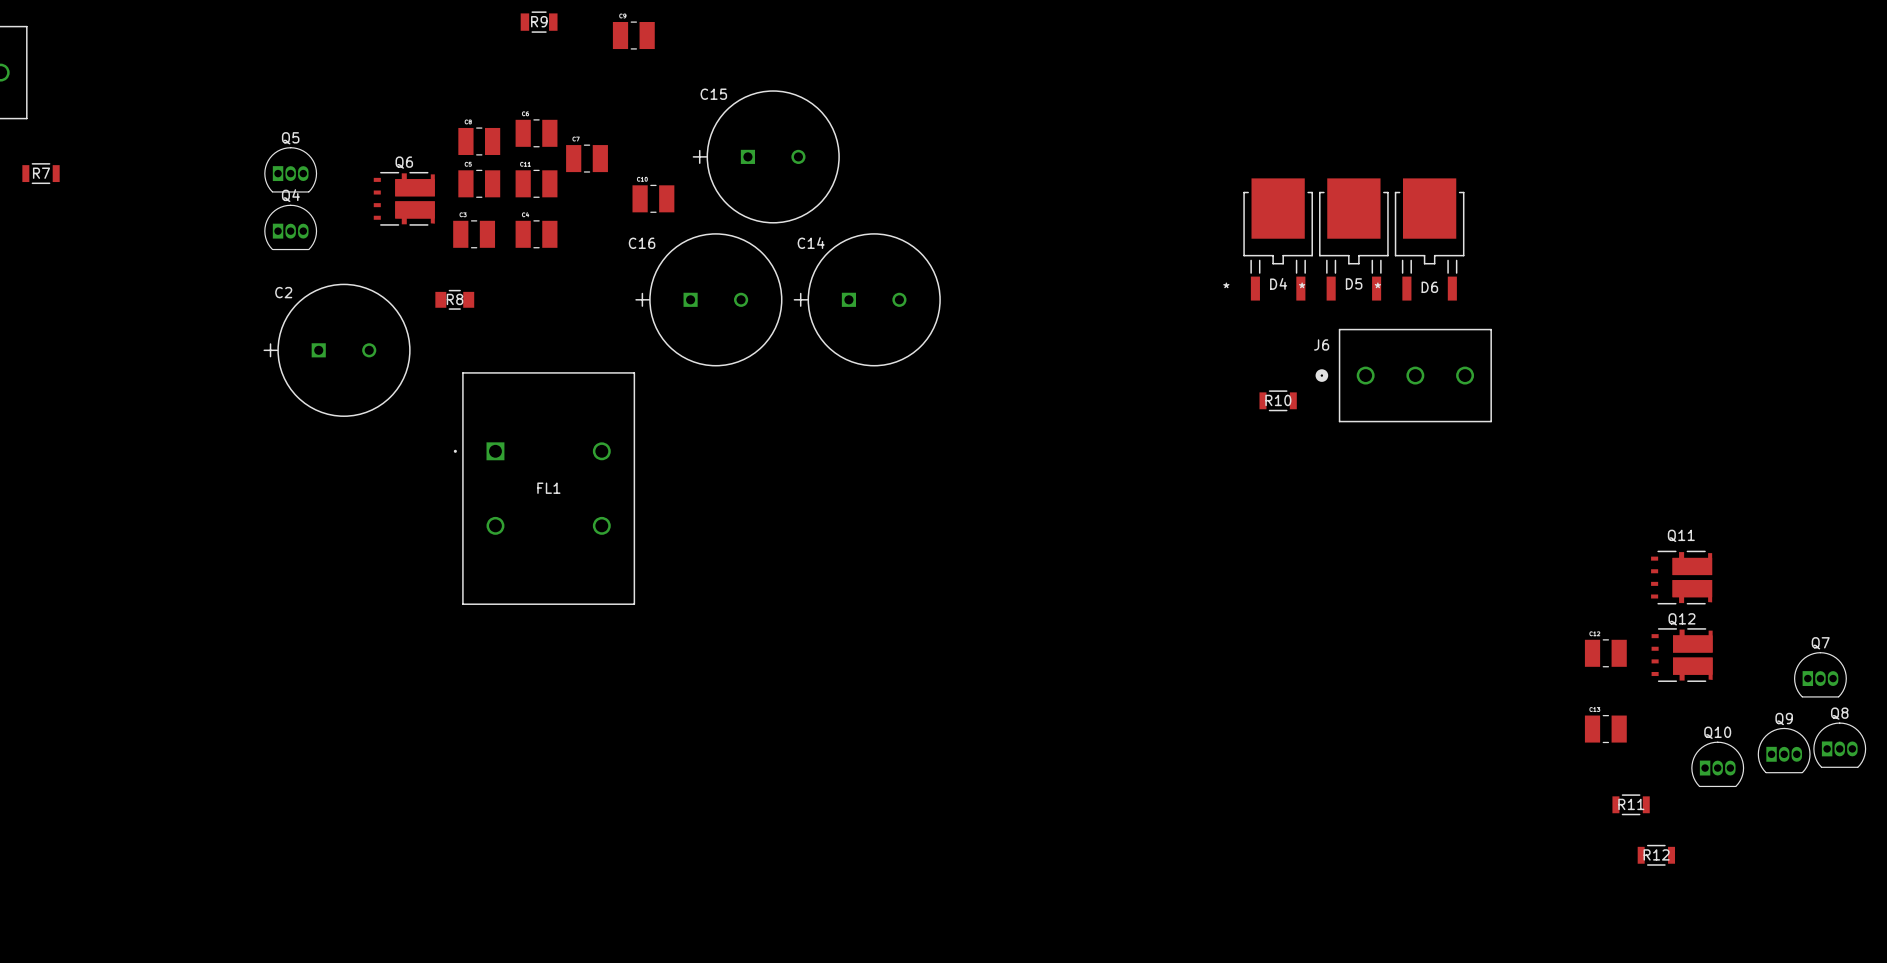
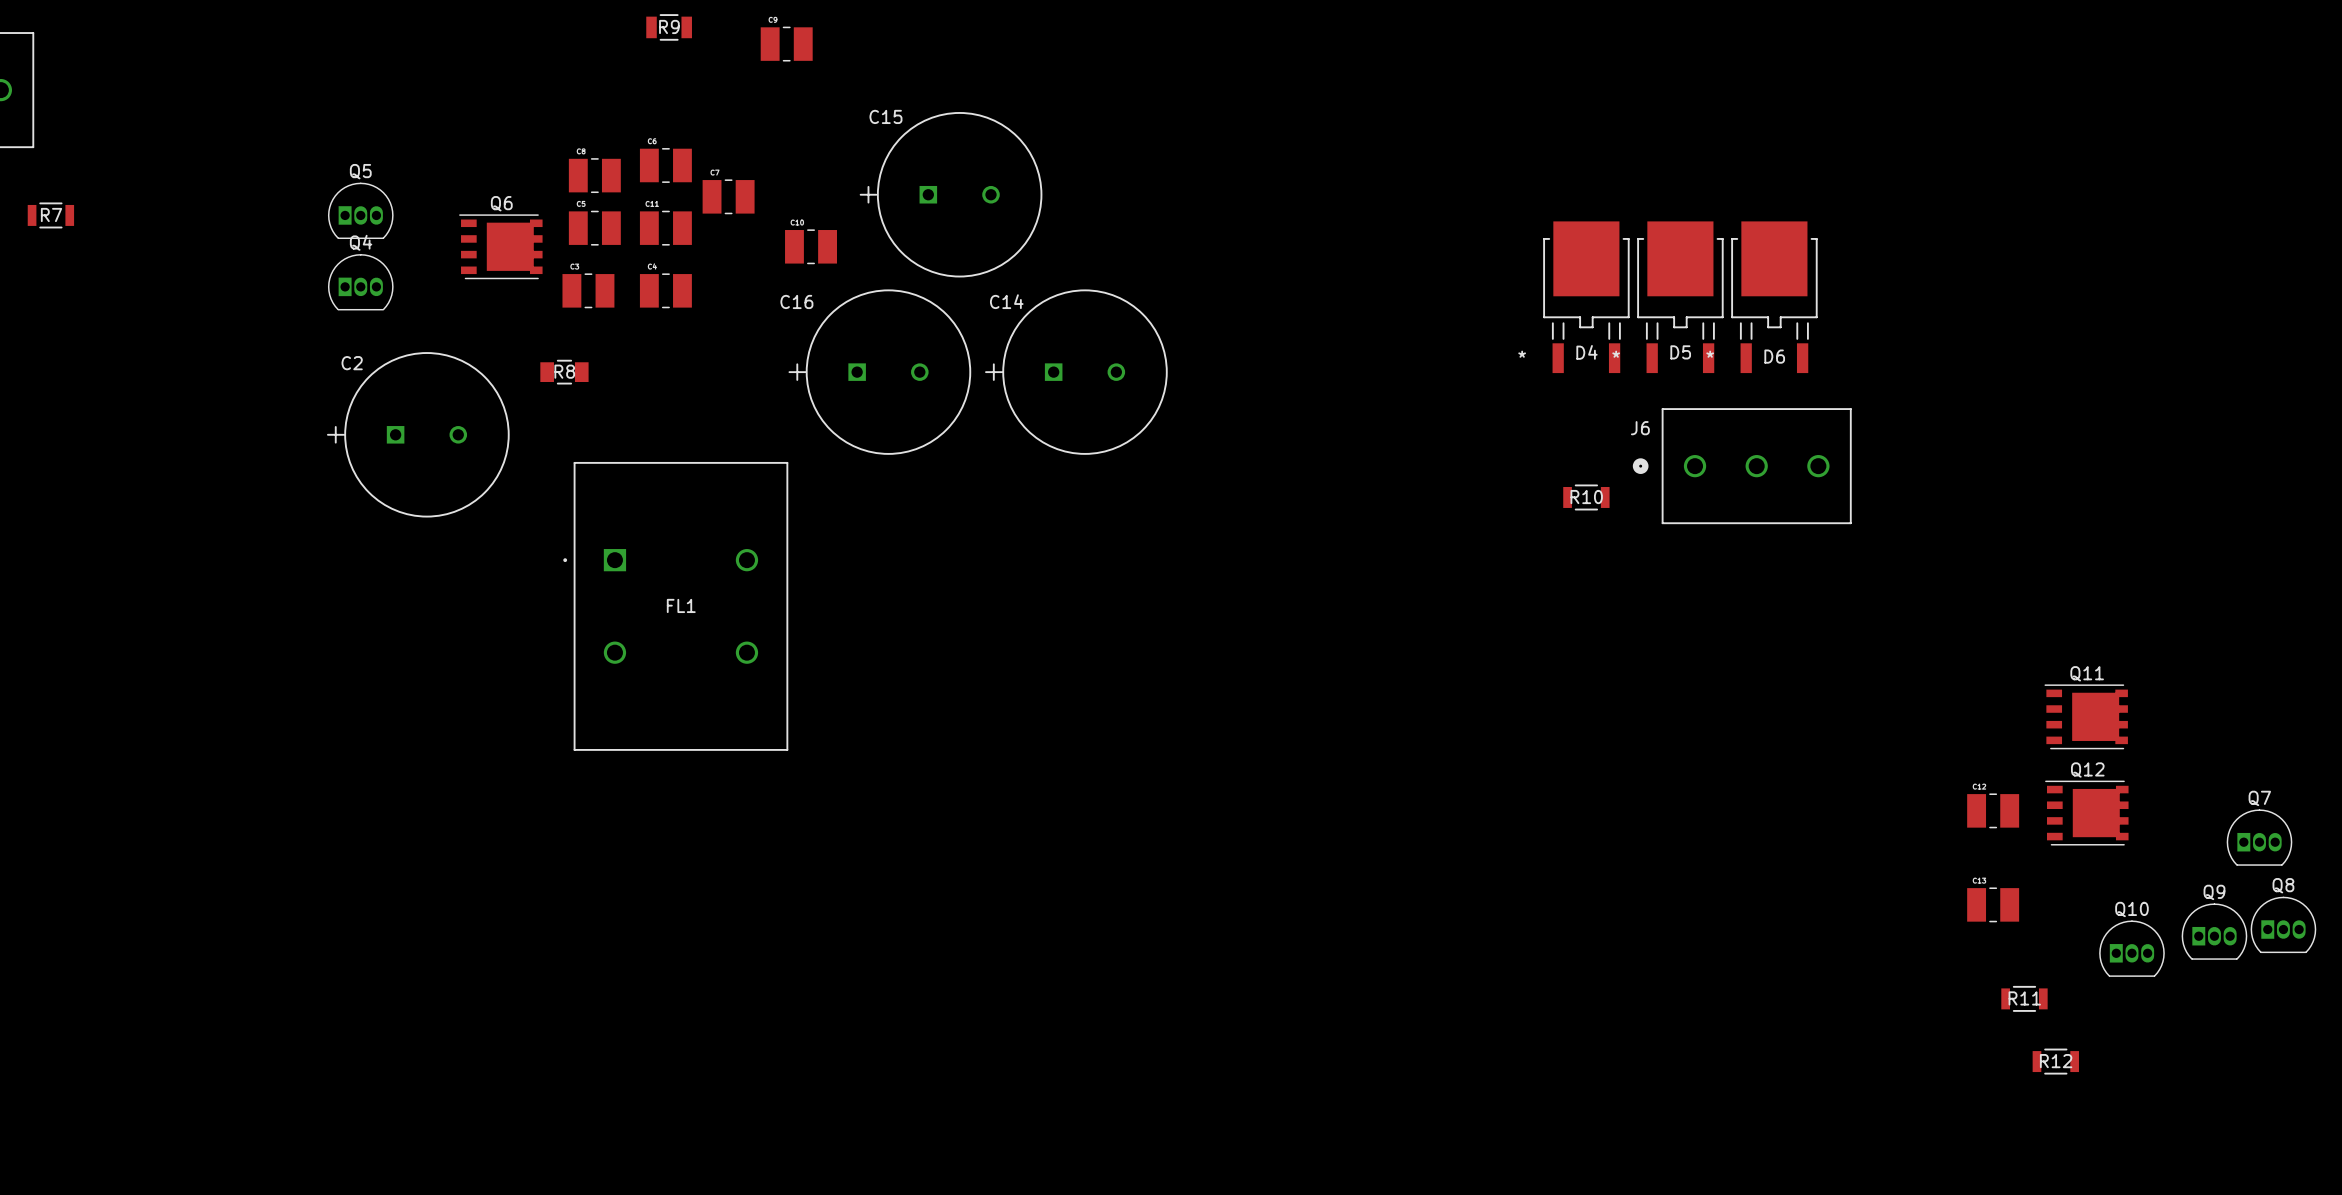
Q6 footprint: [373, 171, 435, 226] -> [459, 214, 543, 280]
Q11 footprint: [1651, 550, 1713, 605] -> [2044, 684, 2128, 750]
Q12 footprint: [1651, 628, 1713, 682] -> [2045, 780, 2129, 846]

